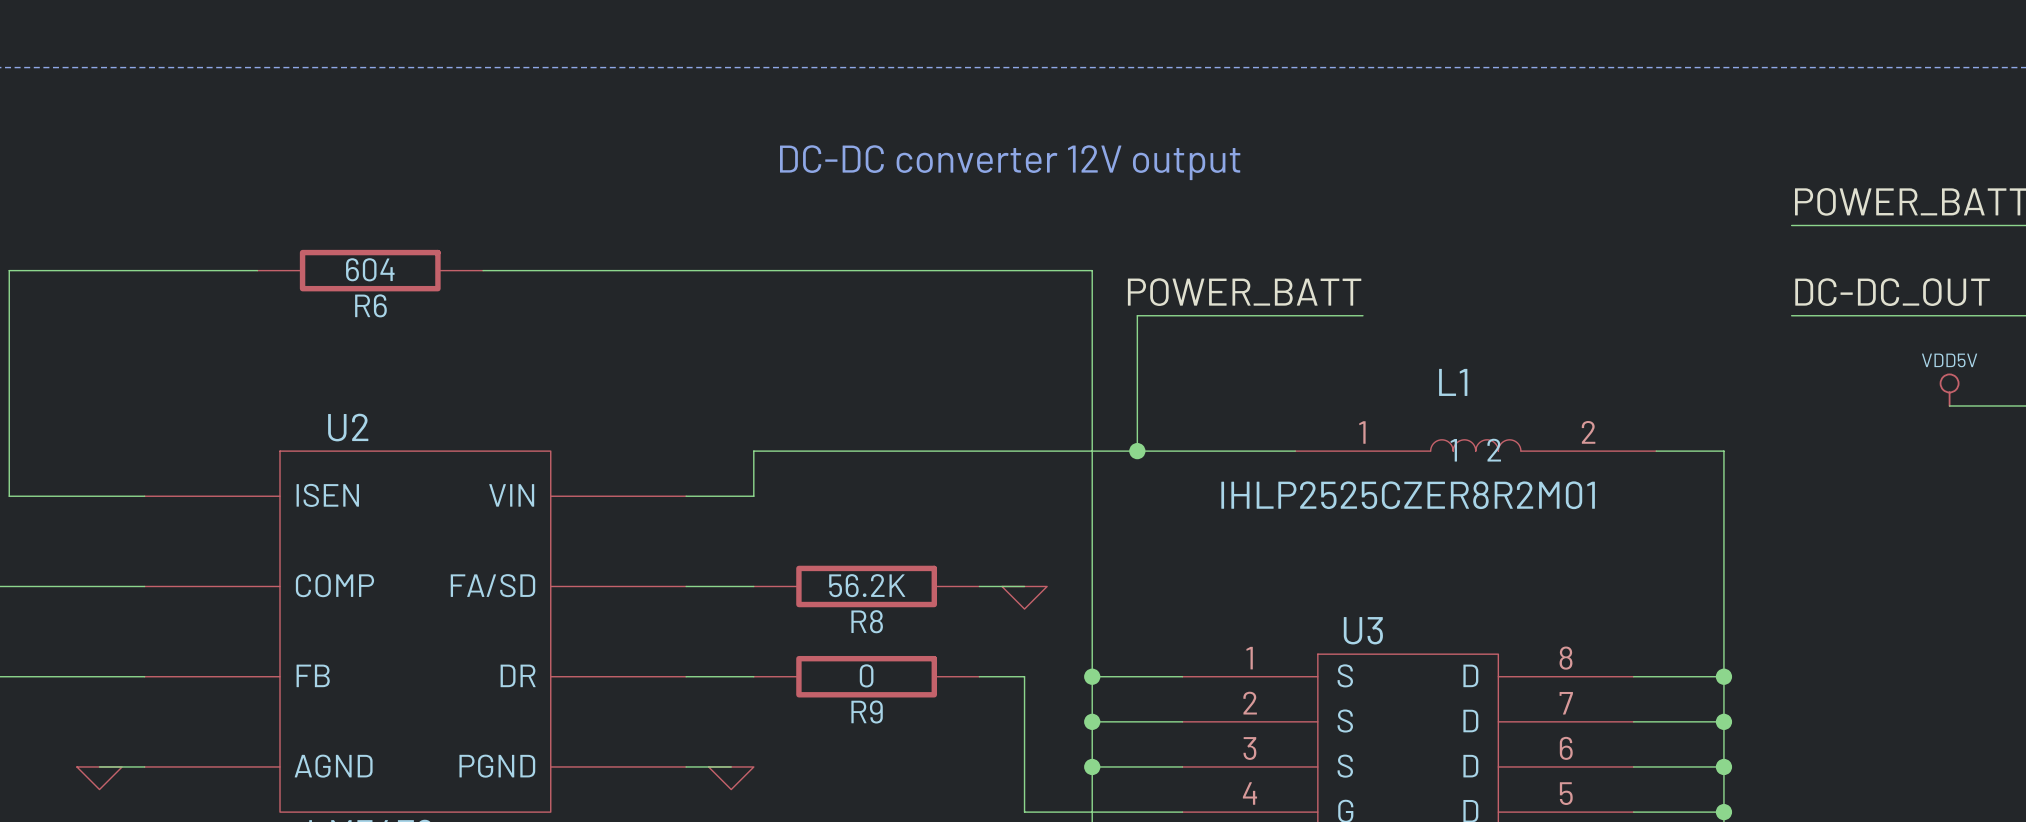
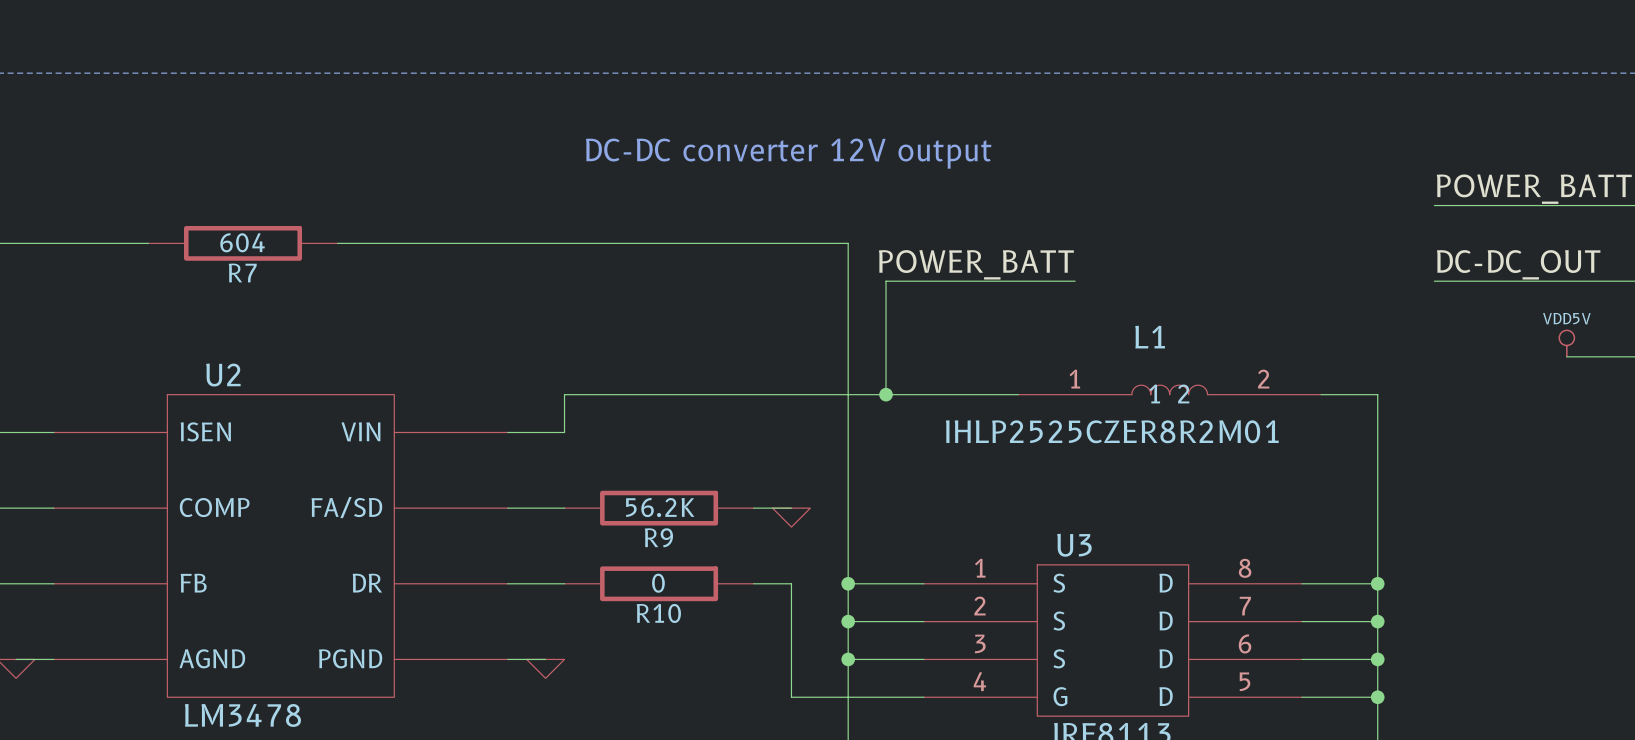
R6 name: R6 (370, 305) -> R7 (242, 272)
R8 name: R8 (867, 621) -> R9 (658, 537)
R9 name: R9 (867, 712) -> R10 (658, 613)

